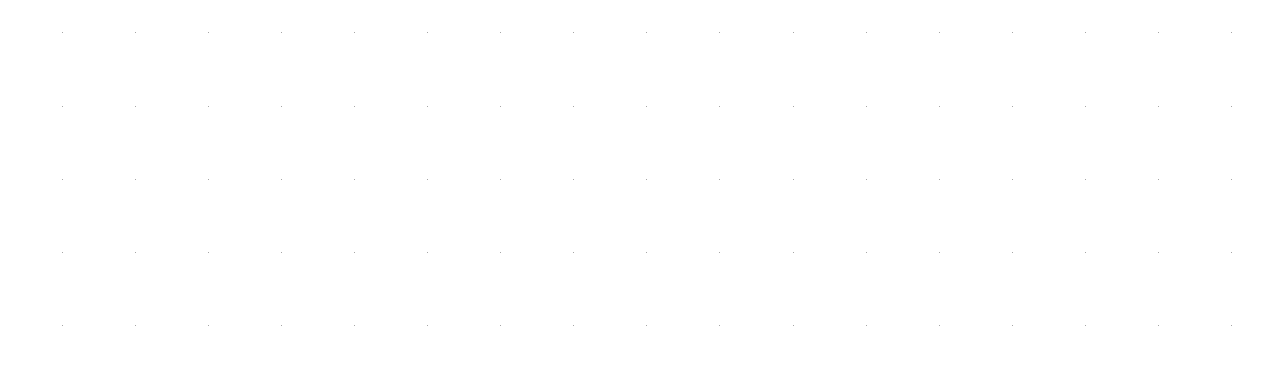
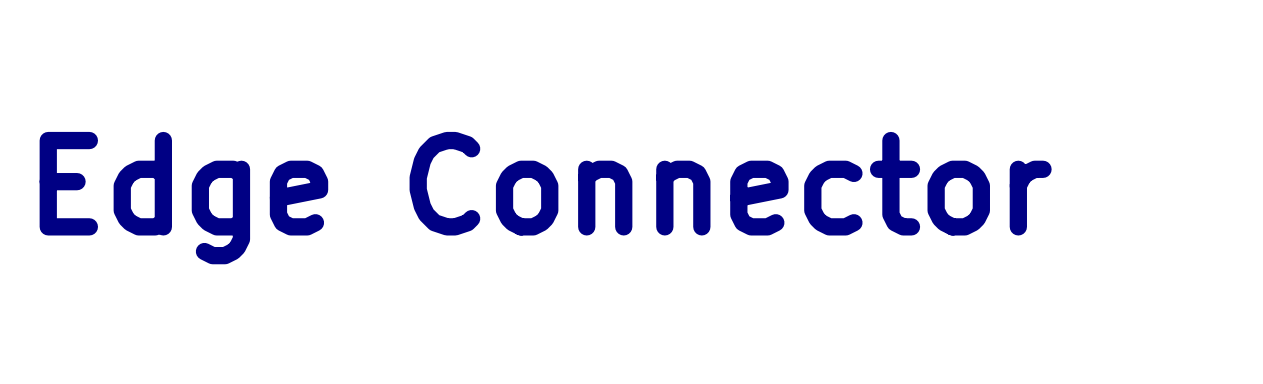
text: none -> Edge Connector (545, 198)

